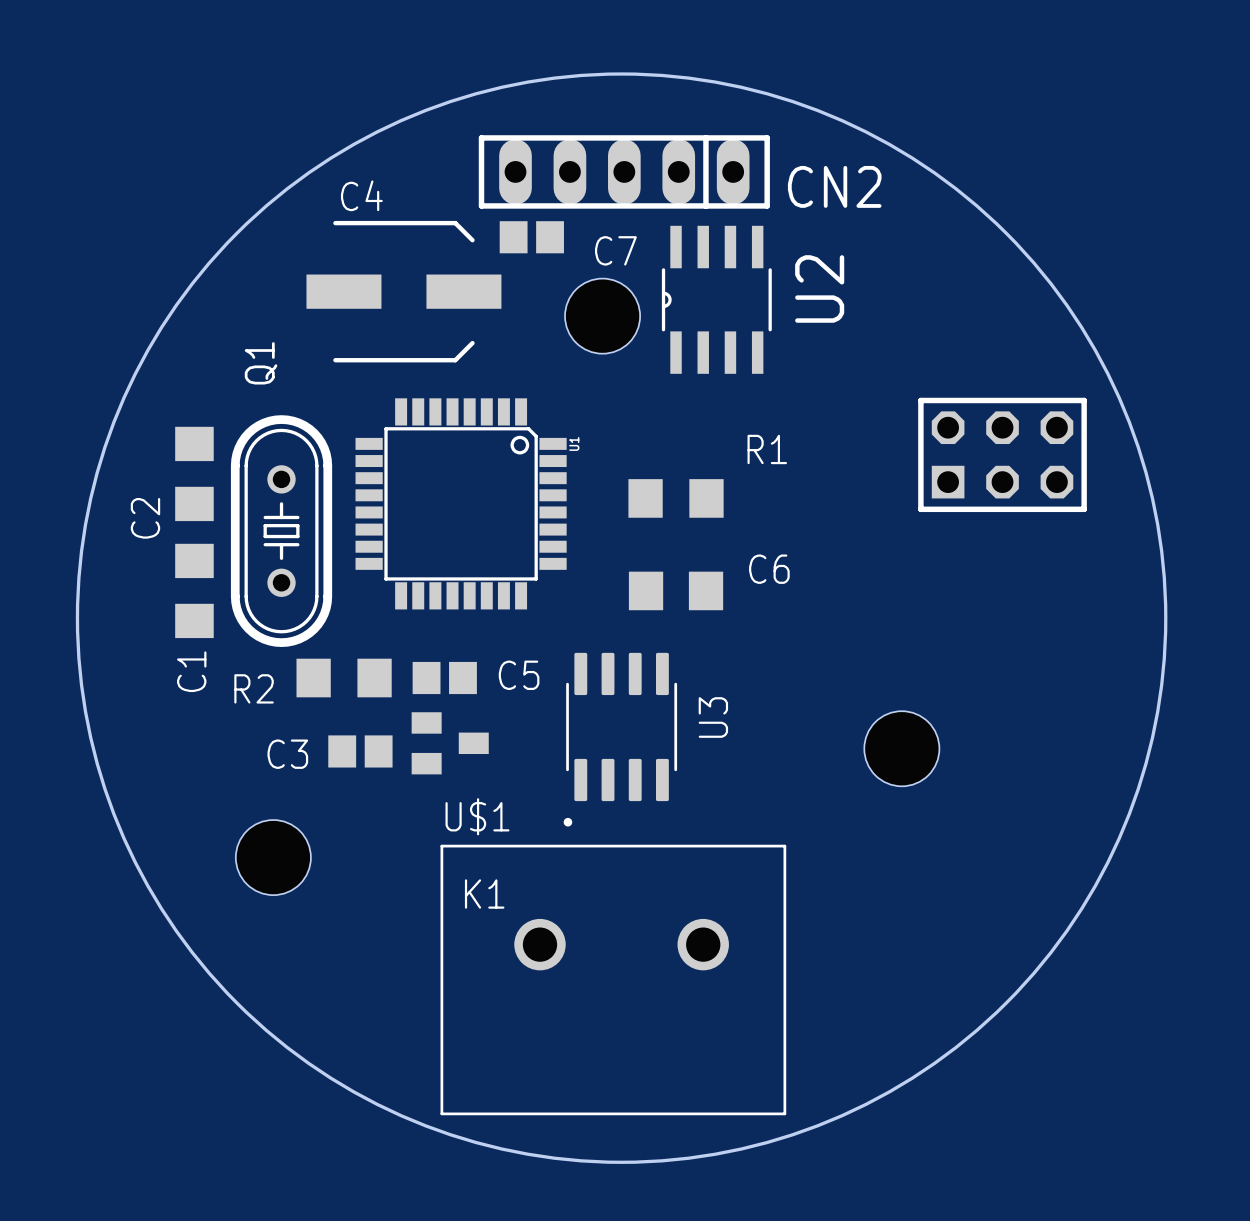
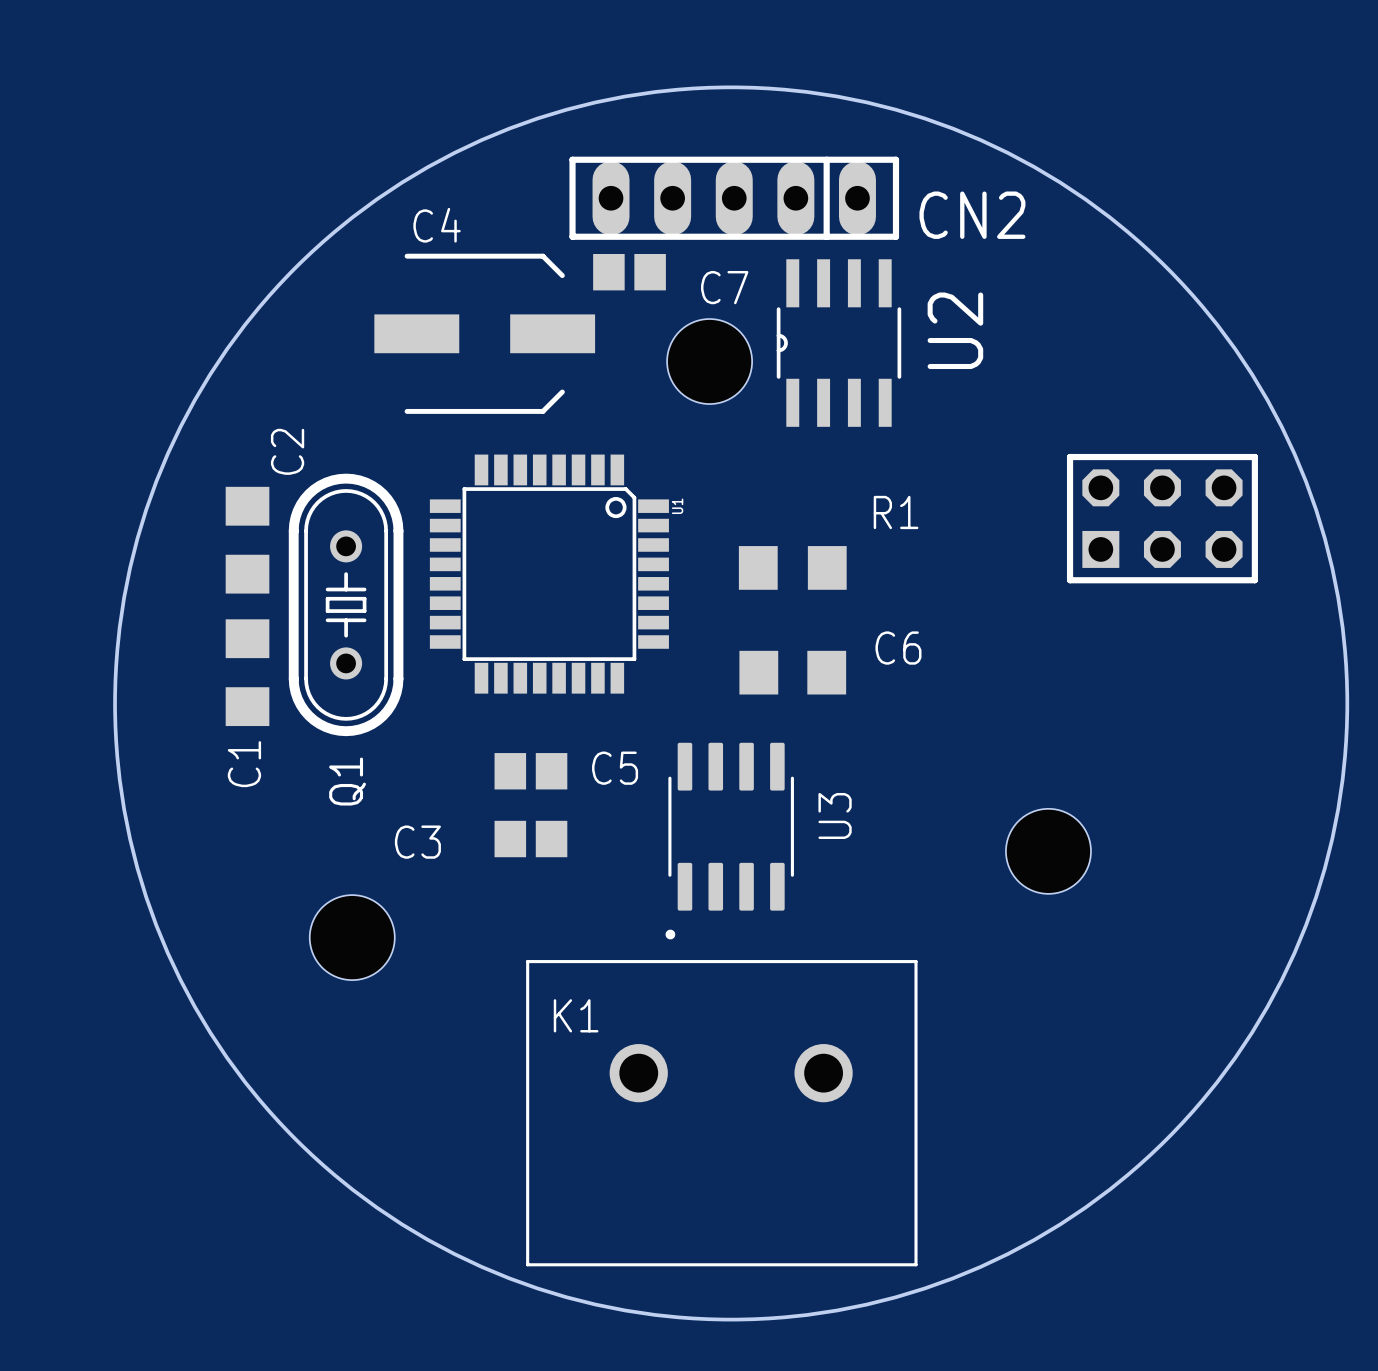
Q1 name position: Q1 (261, 363) -> Q1 (347, 781)
C2 name position: C2 (145, 518) -> C2 (287, 451)
R2: (344, 678) -> none
U$1: (450, 743) -> none
C3 position: (360, 751) -> (530, 839)
C3 name position: C3 (287, 754) -> C3 (417, 842)
hole position: (273, 857) -> (352, 937)

